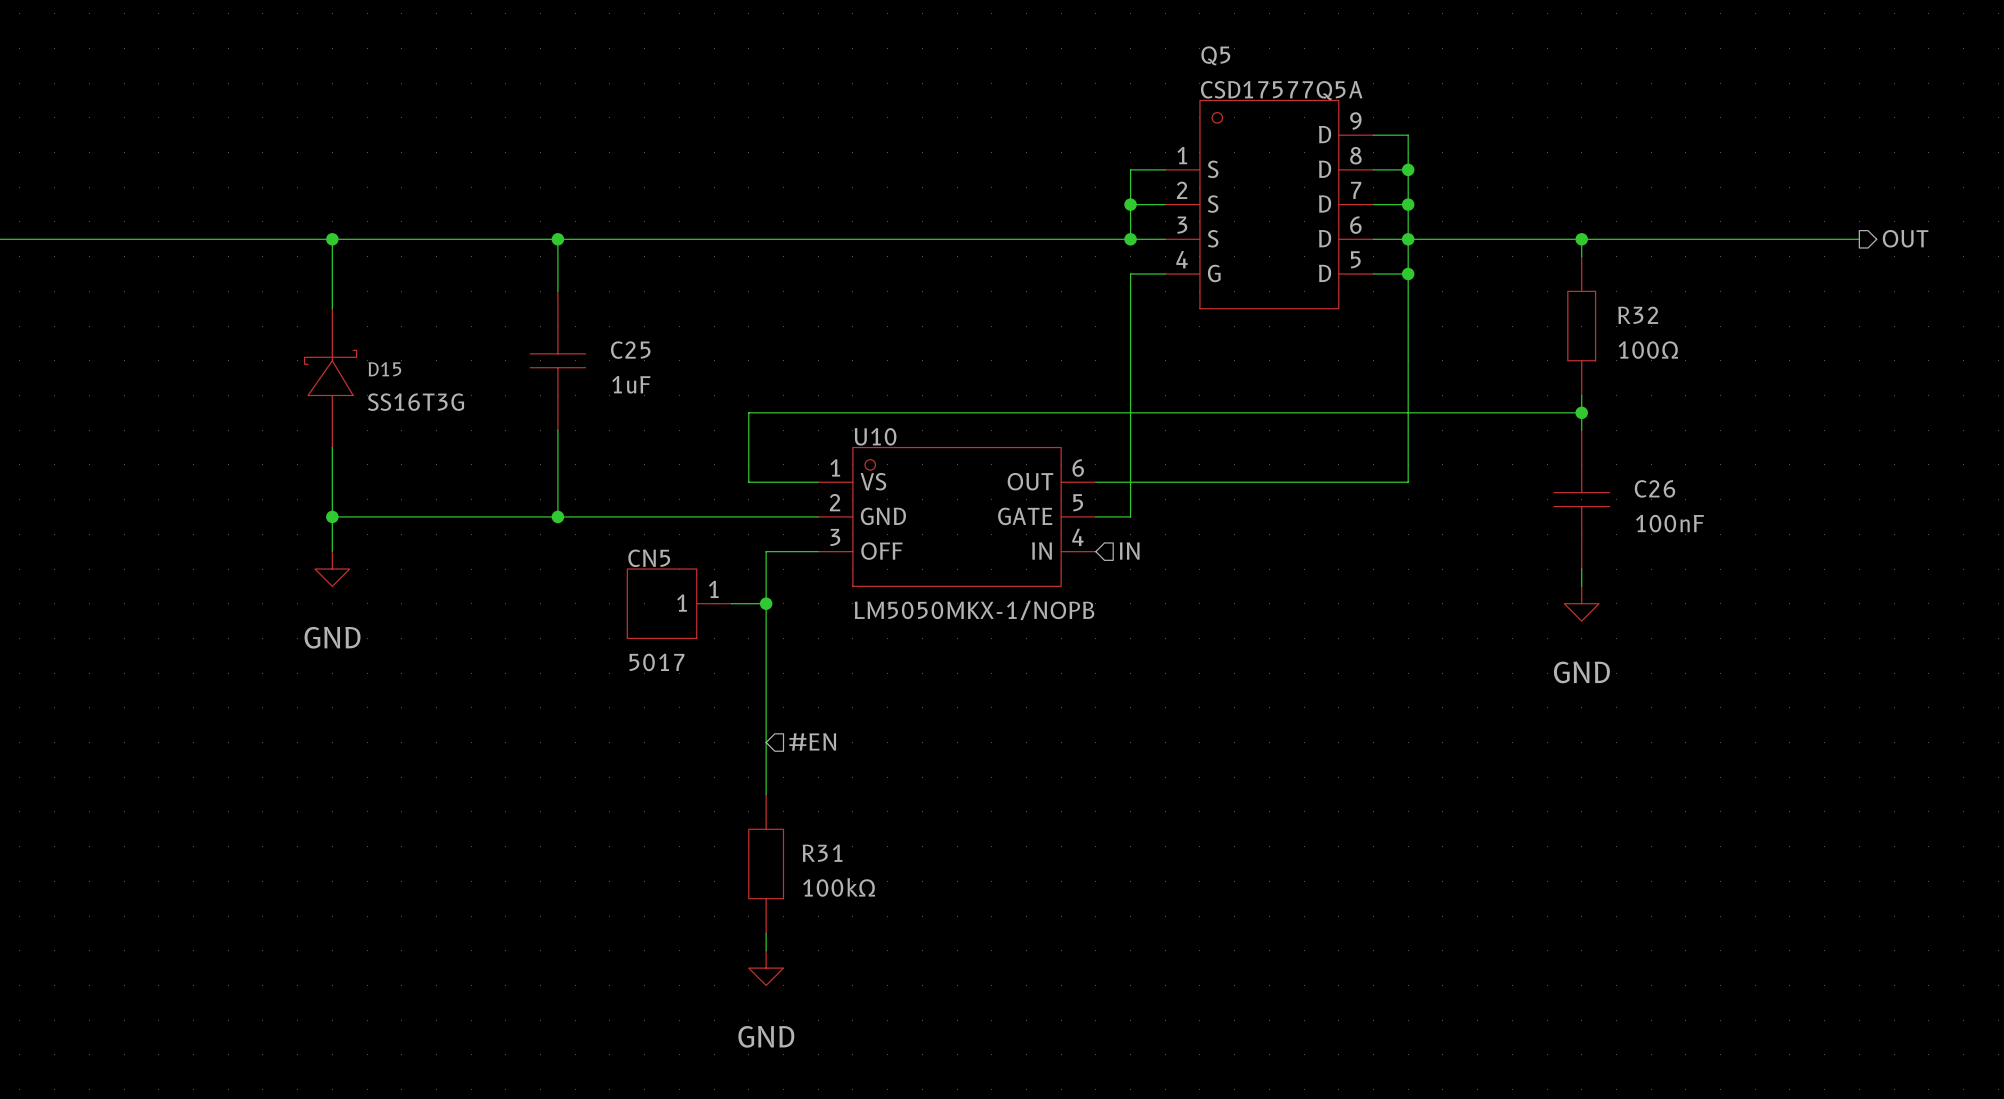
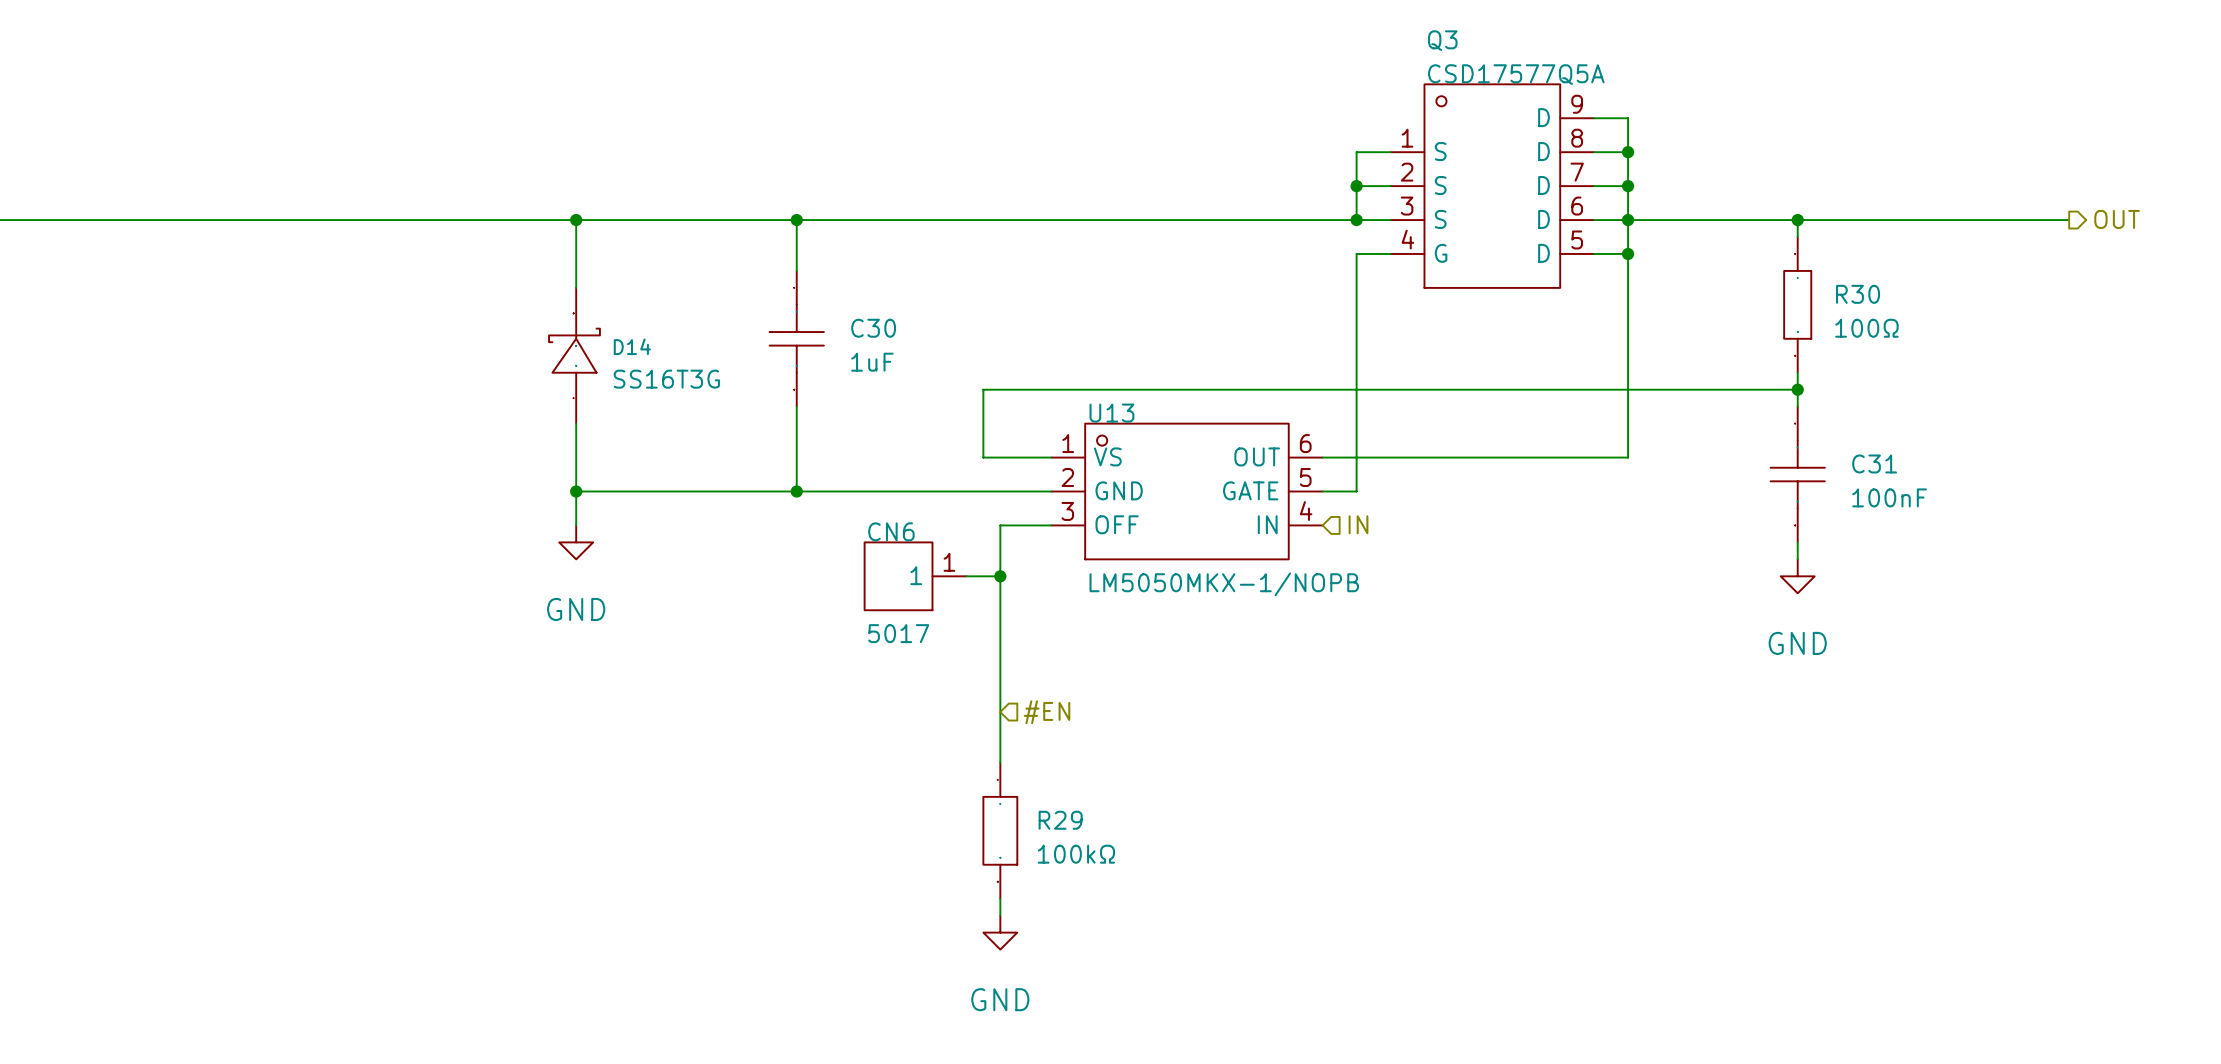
Q5 name: Q5 (1215, 55) -> Q3 (1442, 40)
R32 name: R32 (1638, 315) -> R30 (1858, 294)
C25 name: C25 (630, 350) -> C30 (873, 328)
D15 name: D15 (384, 369) -> D14 (632, 346)
U10 name: U10 (875, 436) -> U13 (1111, 413)
C26 name: C26 (1654, 488) -> C31 (1874, 463)
CN5 name: CN5 (649, 558) -> CN6 (891, 531)
R31 name: R31 (822, 853) -> R29 (1060, 820)

